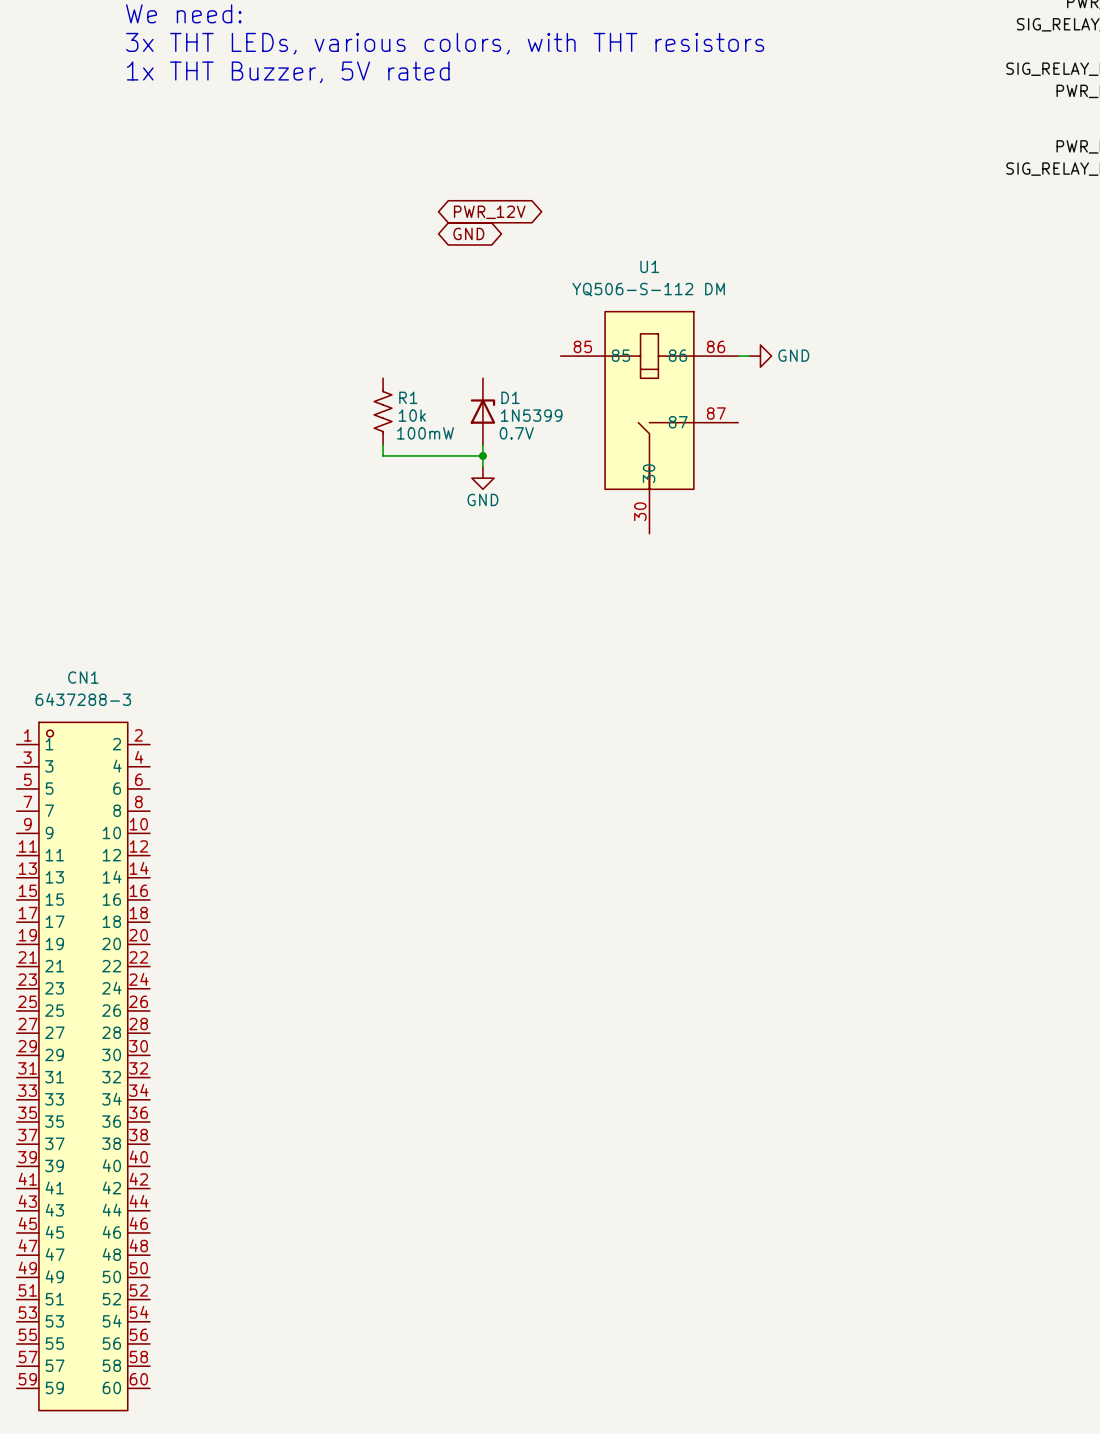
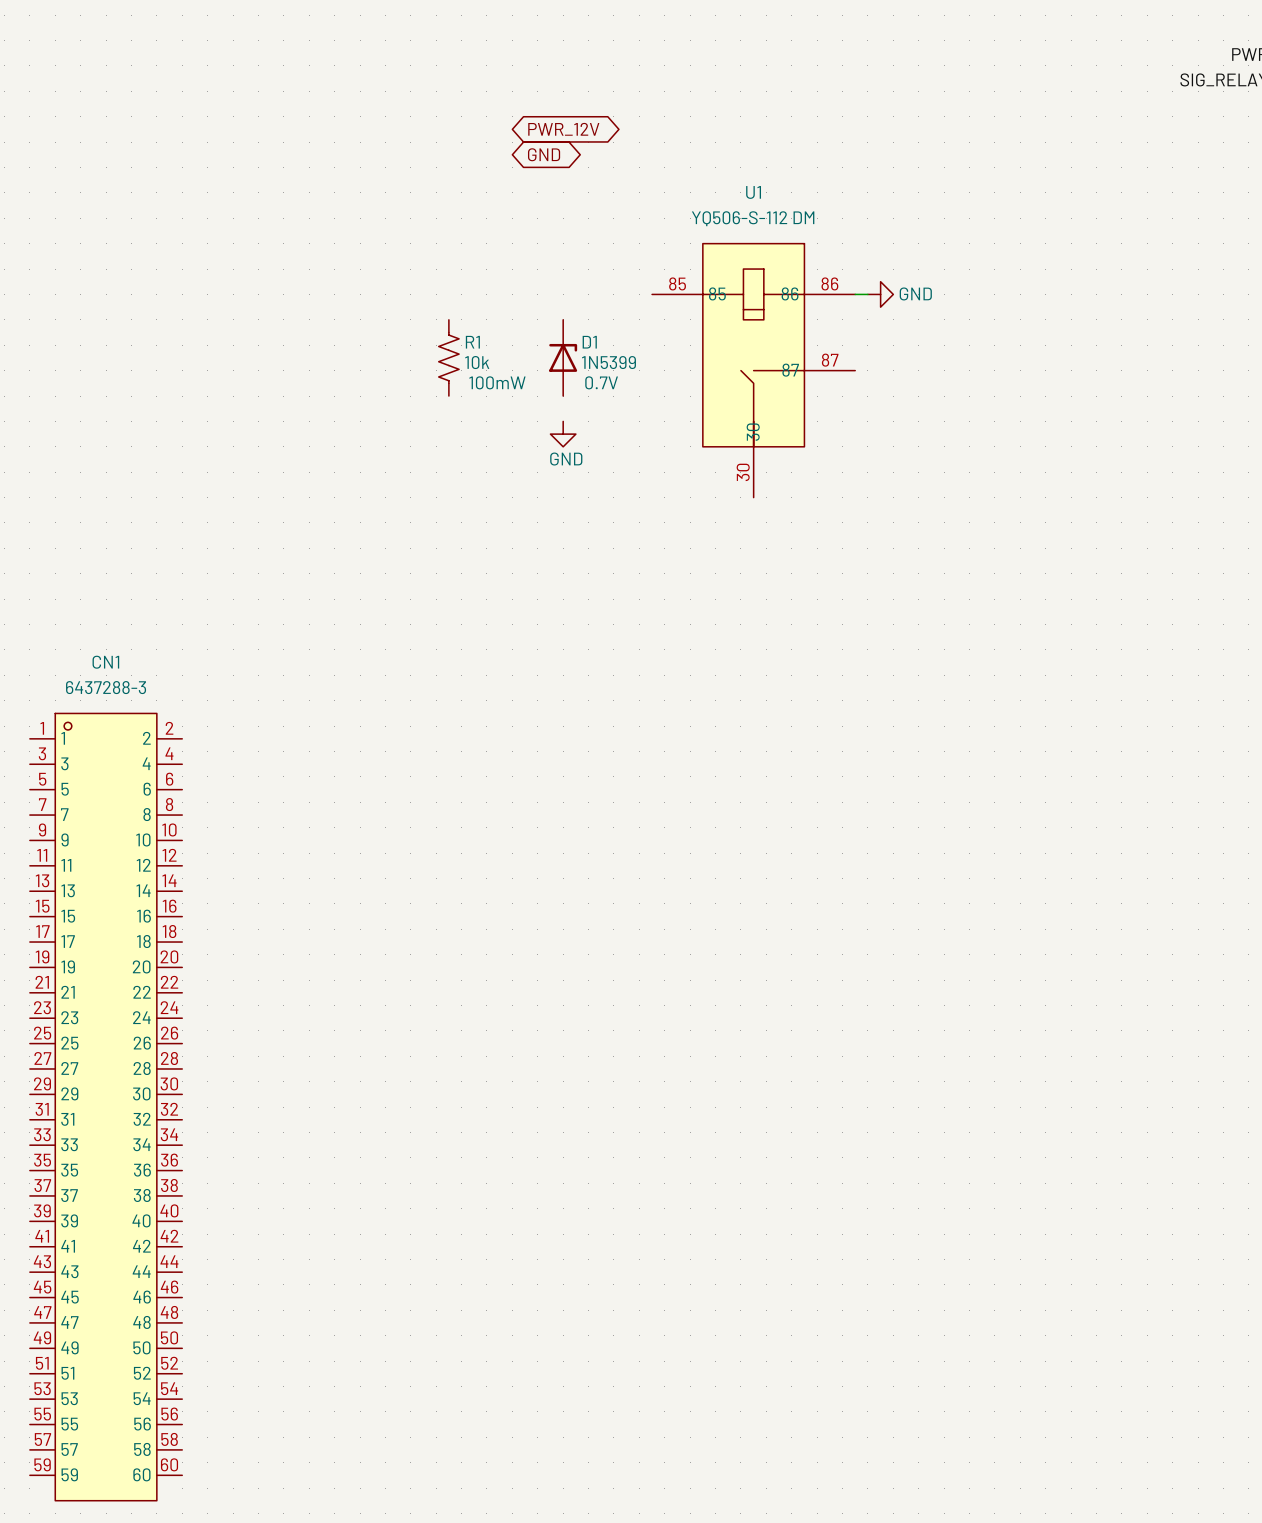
wire: (383, 444) (383, 455) (482, 455) -> none
wire: (482, 444) (482, 467) -> none
junction: (482, 455) -> none

